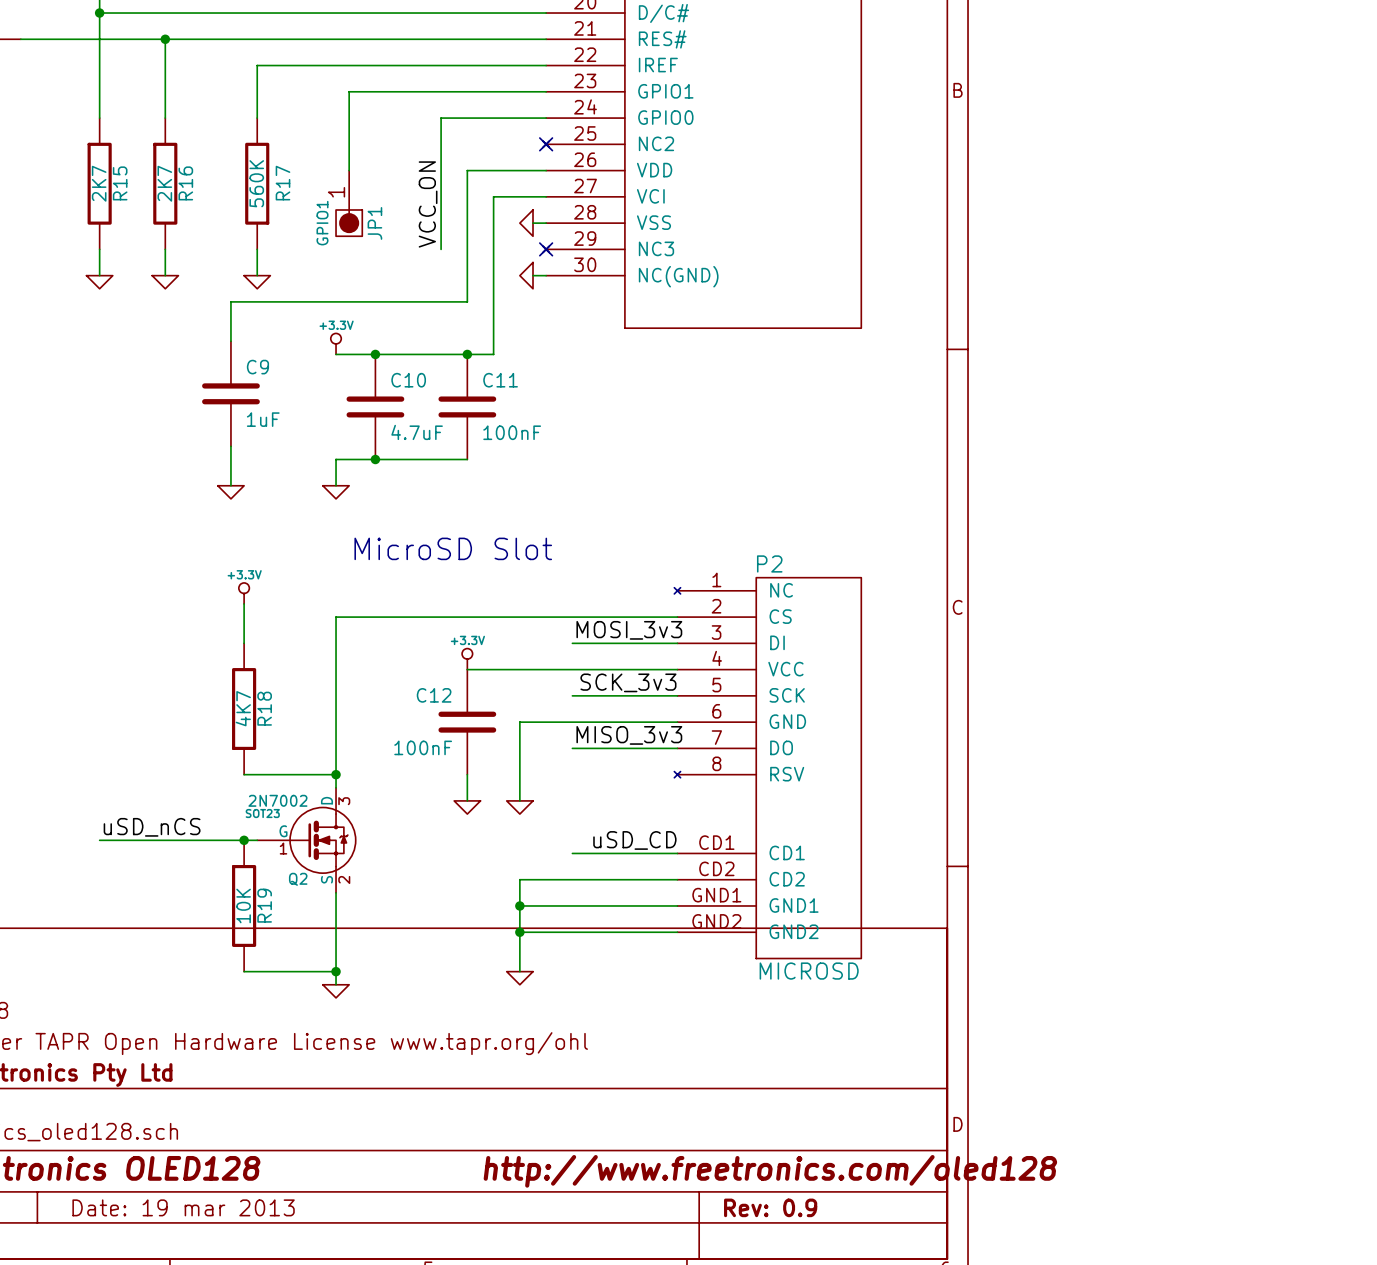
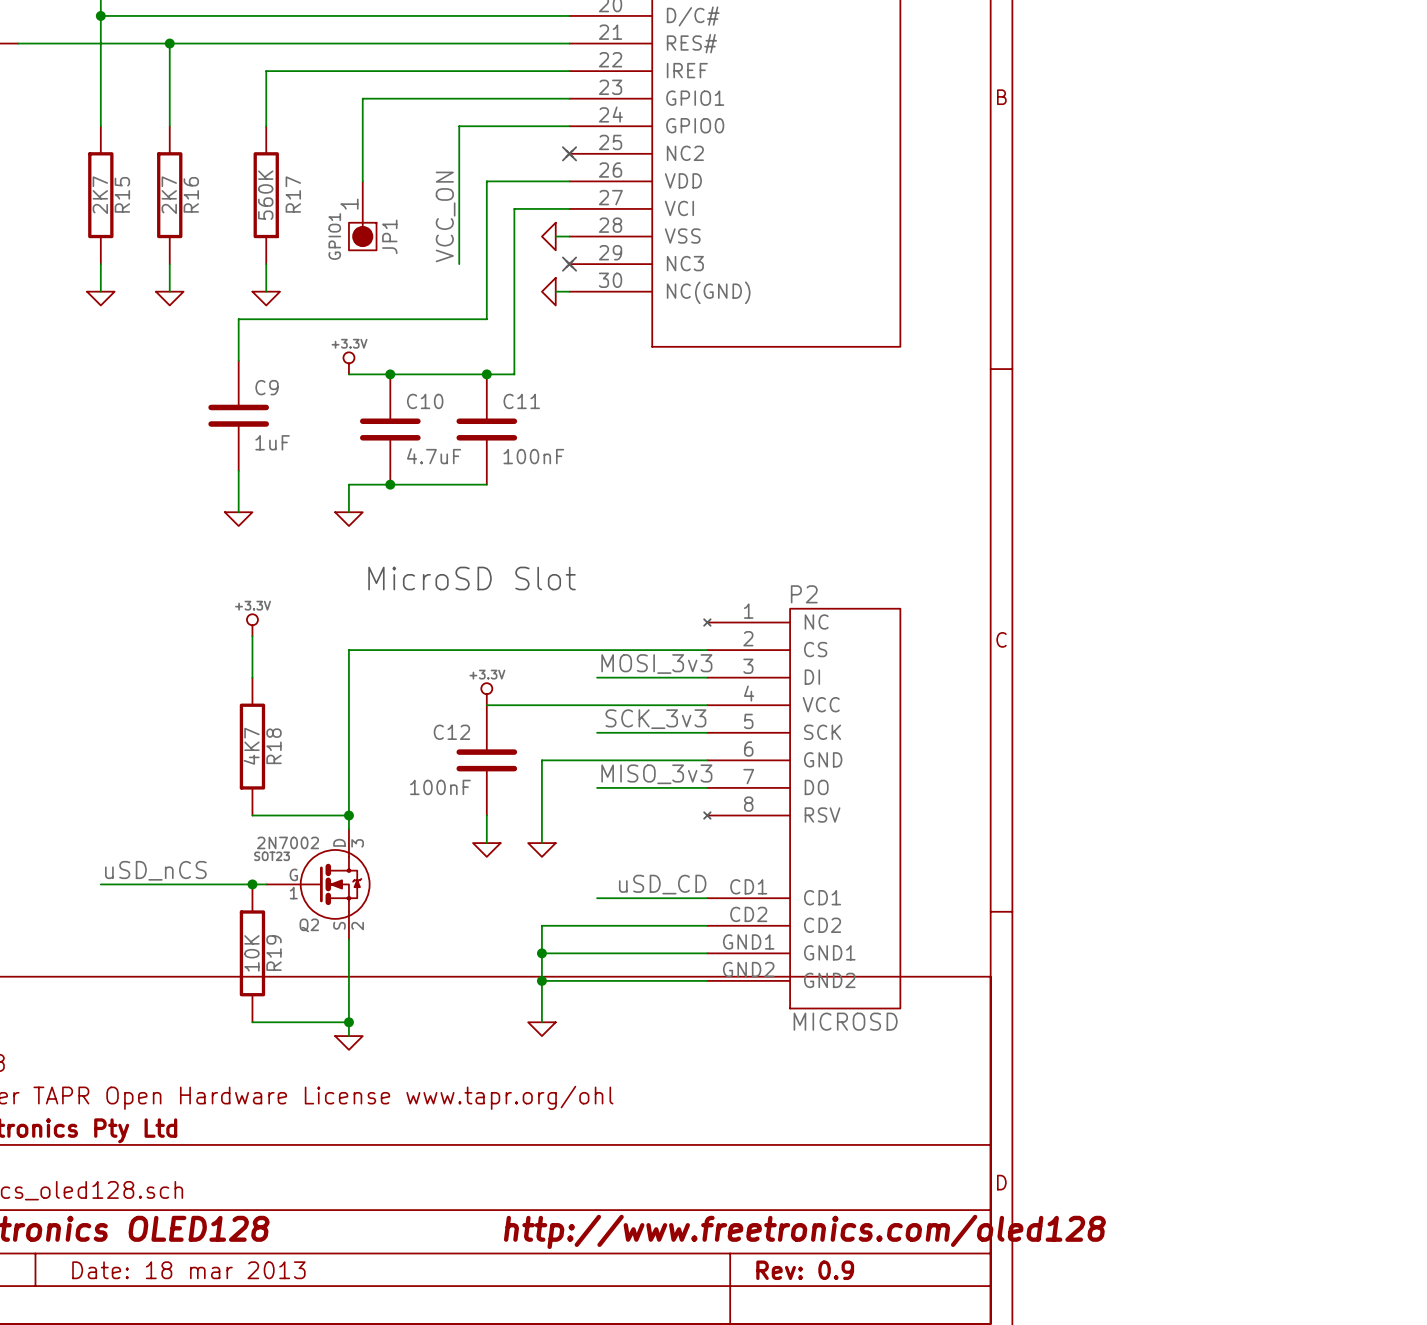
title block: Date: 19 mar 2013 (183, 1207) -> Date: 18 mar 2013 (188, 1270)

